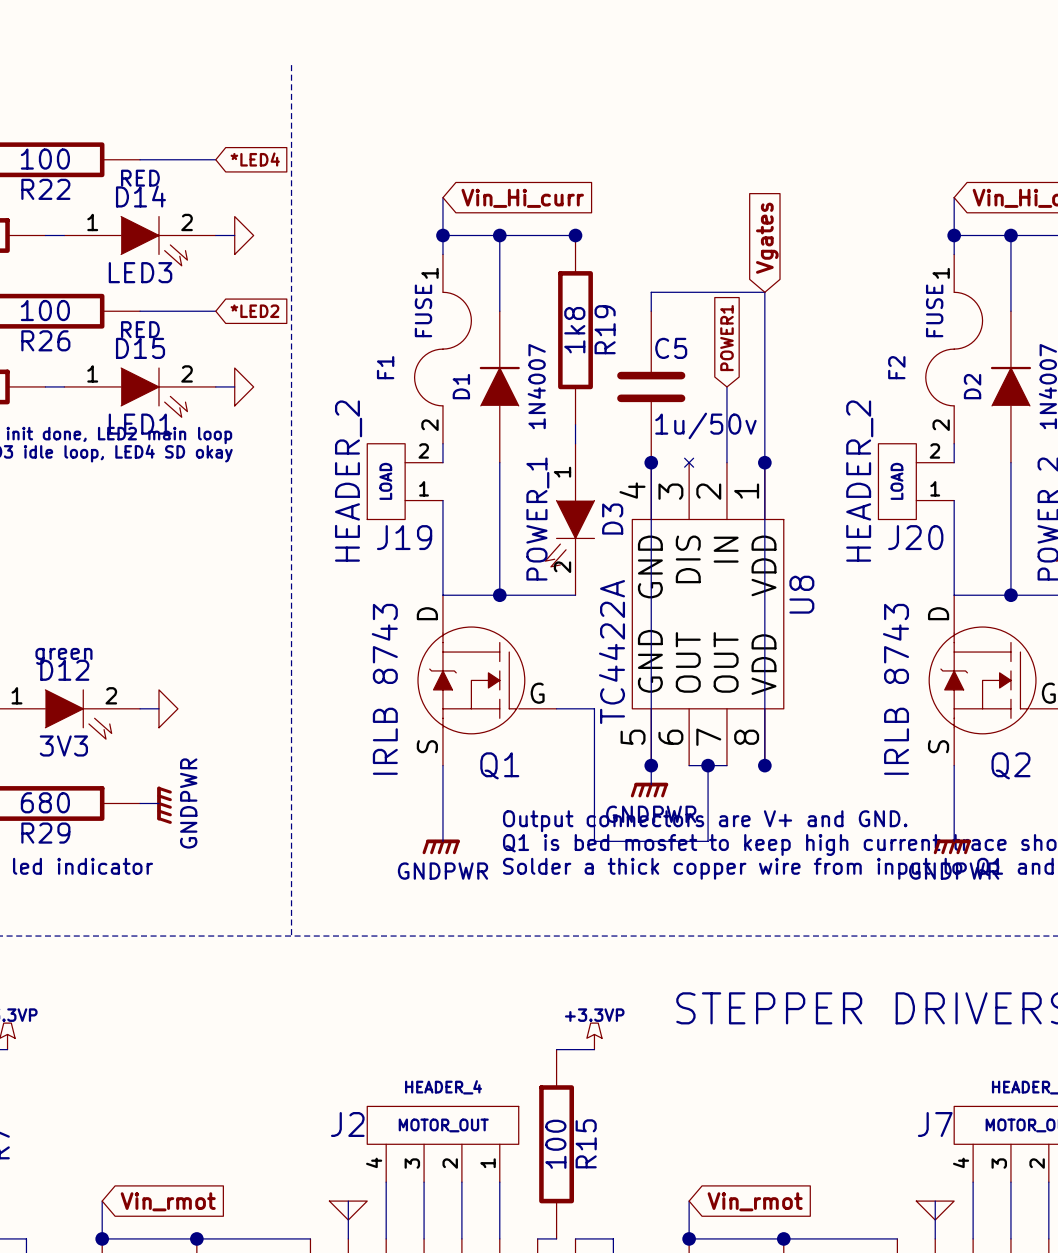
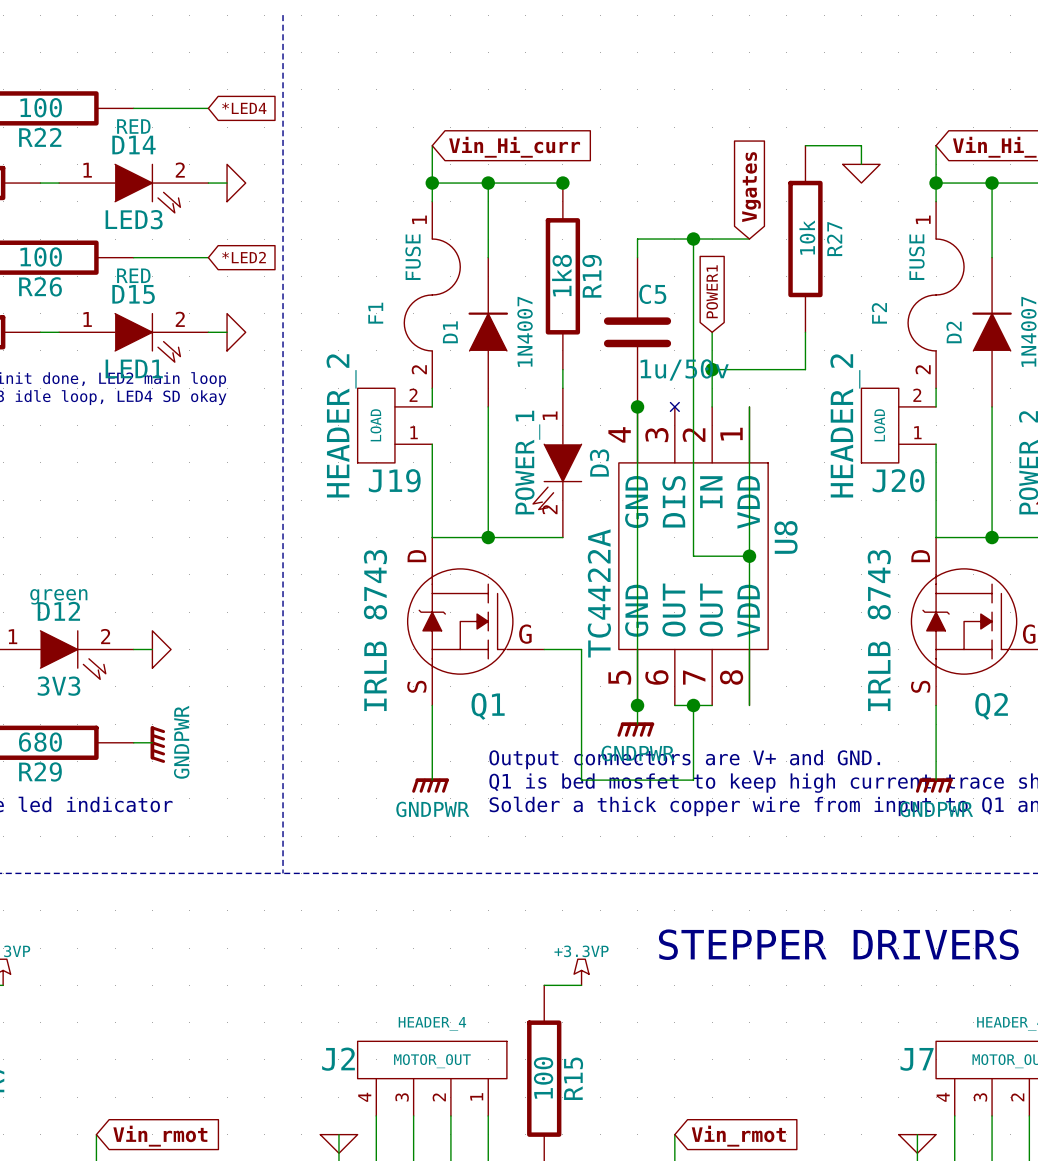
wire: none -> (805, 145) (861, 145) (861, 164)
power symbol: none -> (861, 173)
wire: none -> (693, 239) (693, 556) (749, 556)
junction: none -> (693, 239)
wire: (764, 292) (764, 462) -> none
R27: none -> 10k (805, 239)
wire: none -> (805, 332) (805, 369) (712, 369)
junction position: (764, 462) -> (712, 369)
junction: none -> (749, 556)
junction: (764, 765) -> none

